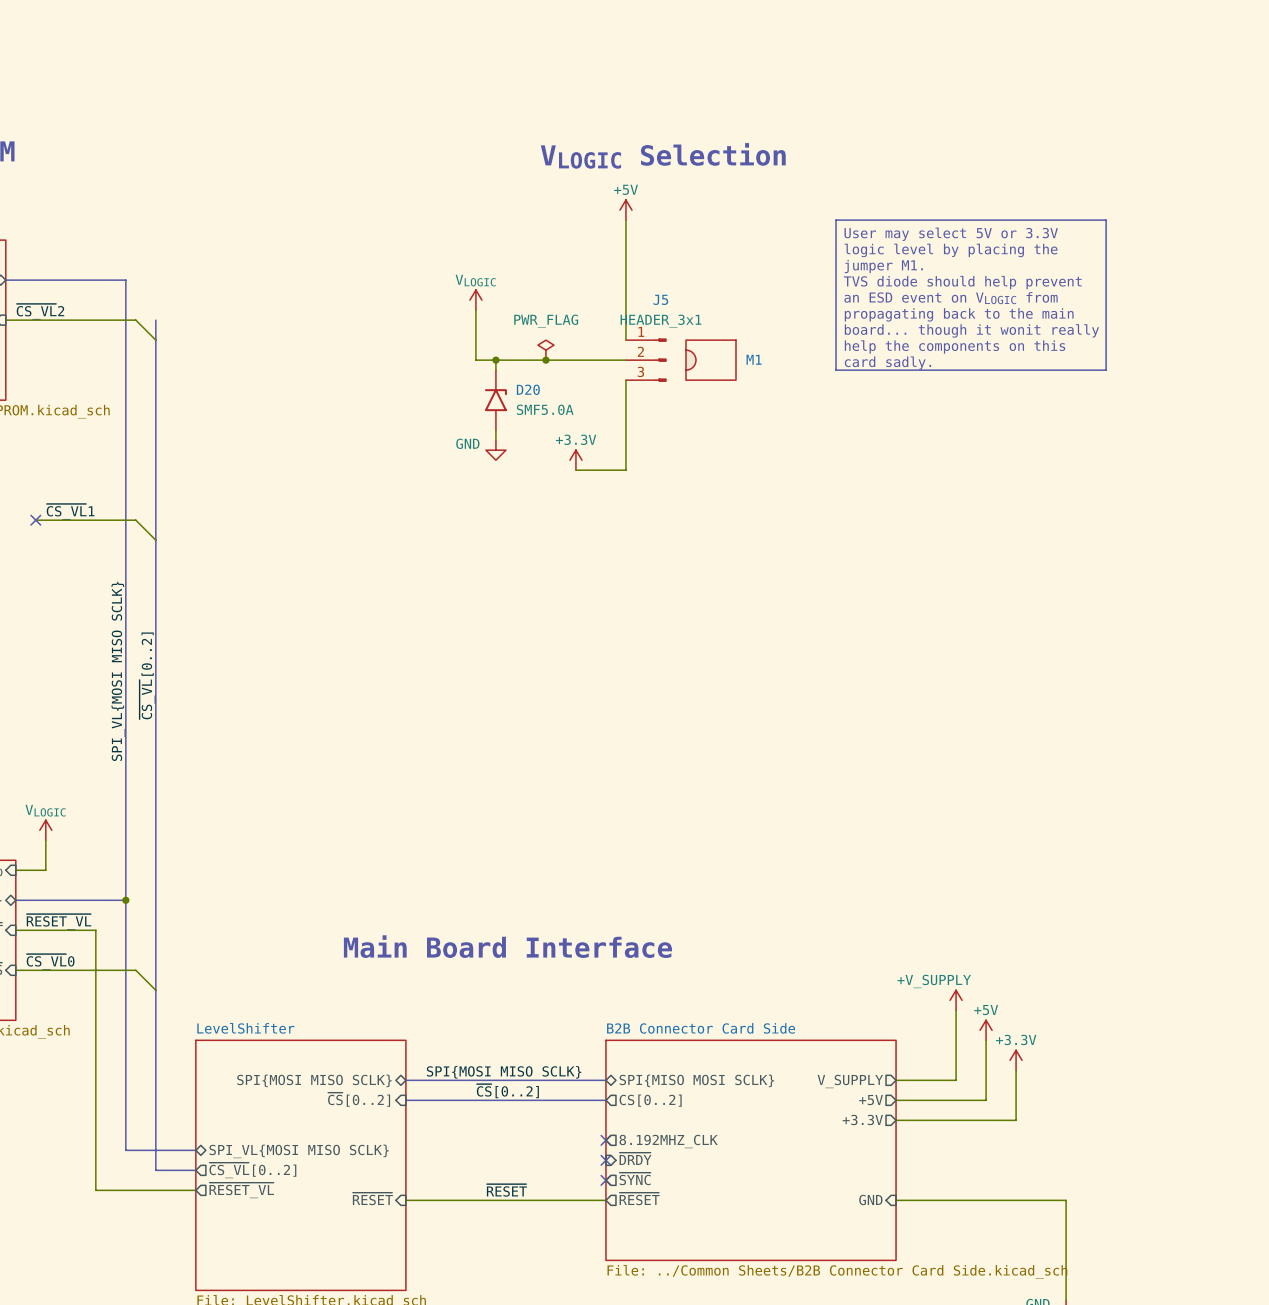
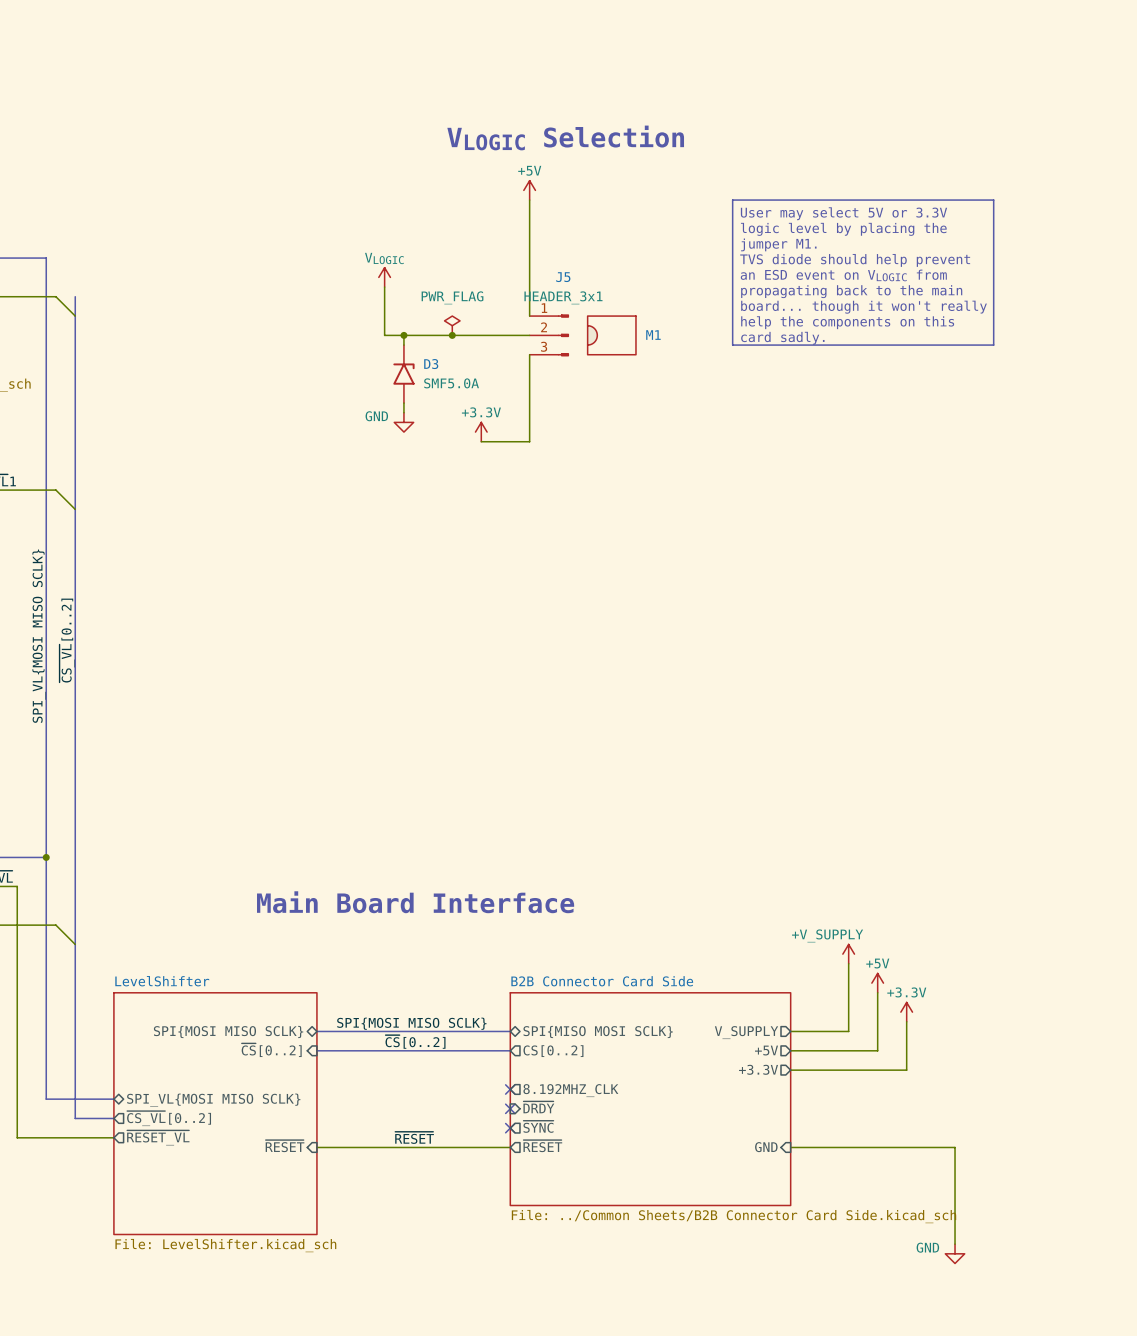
text: board... though it wonit really (971, 330) -> board... though it won't really (864, 307)
D20 name: D20 (528, 389) -> D3 (431, 364)

